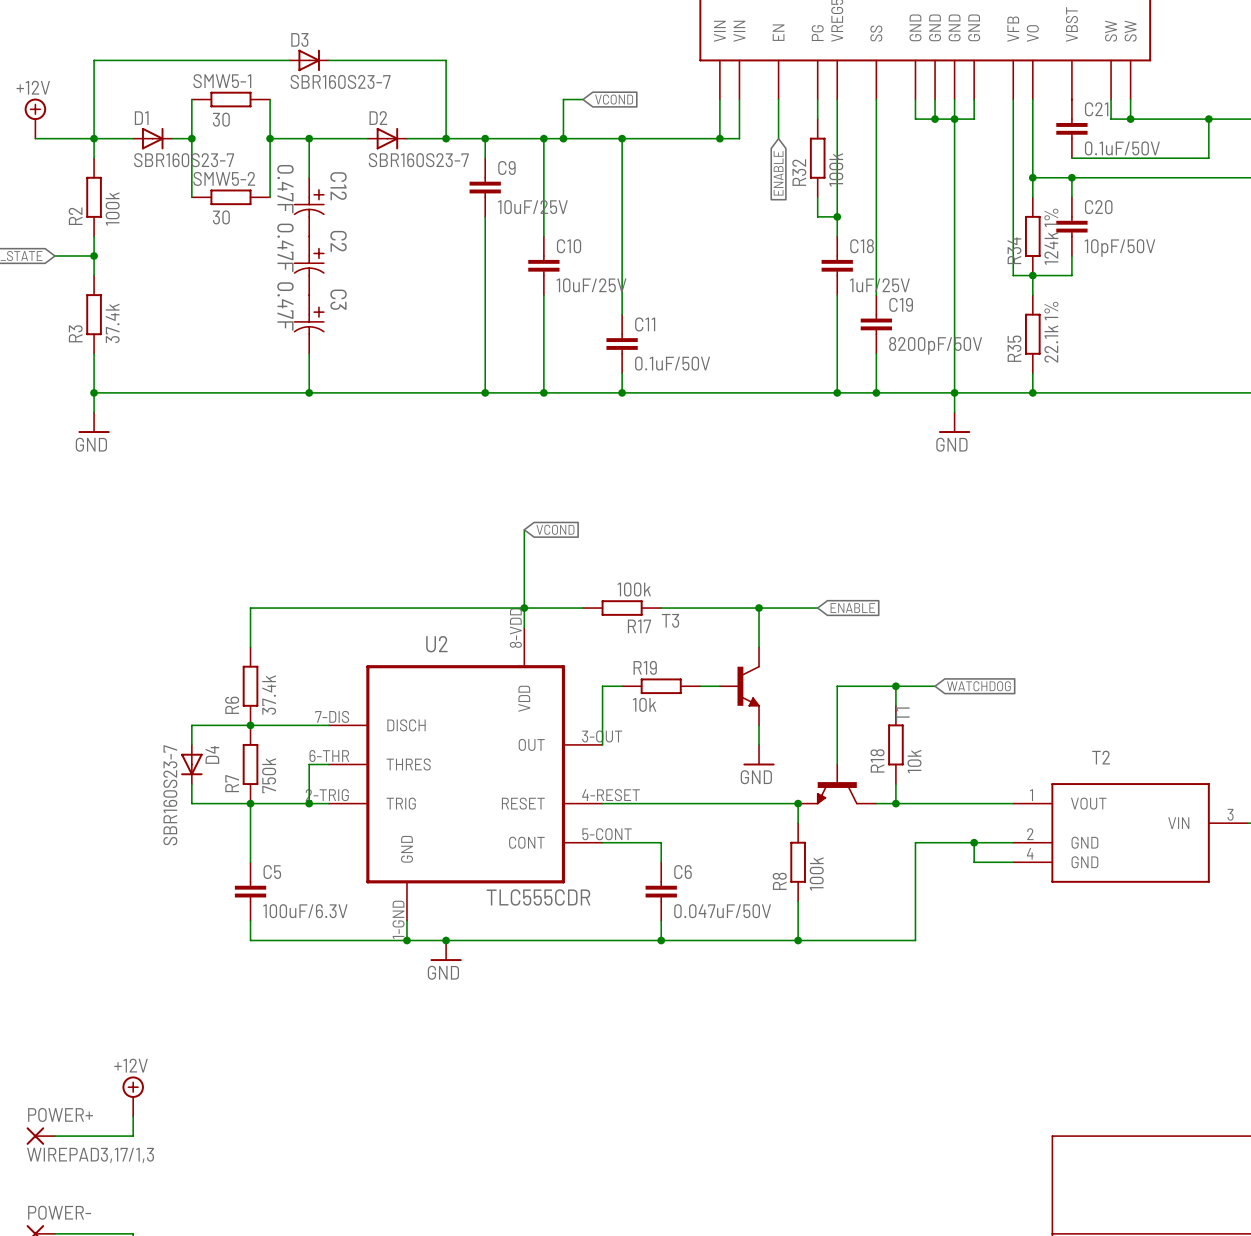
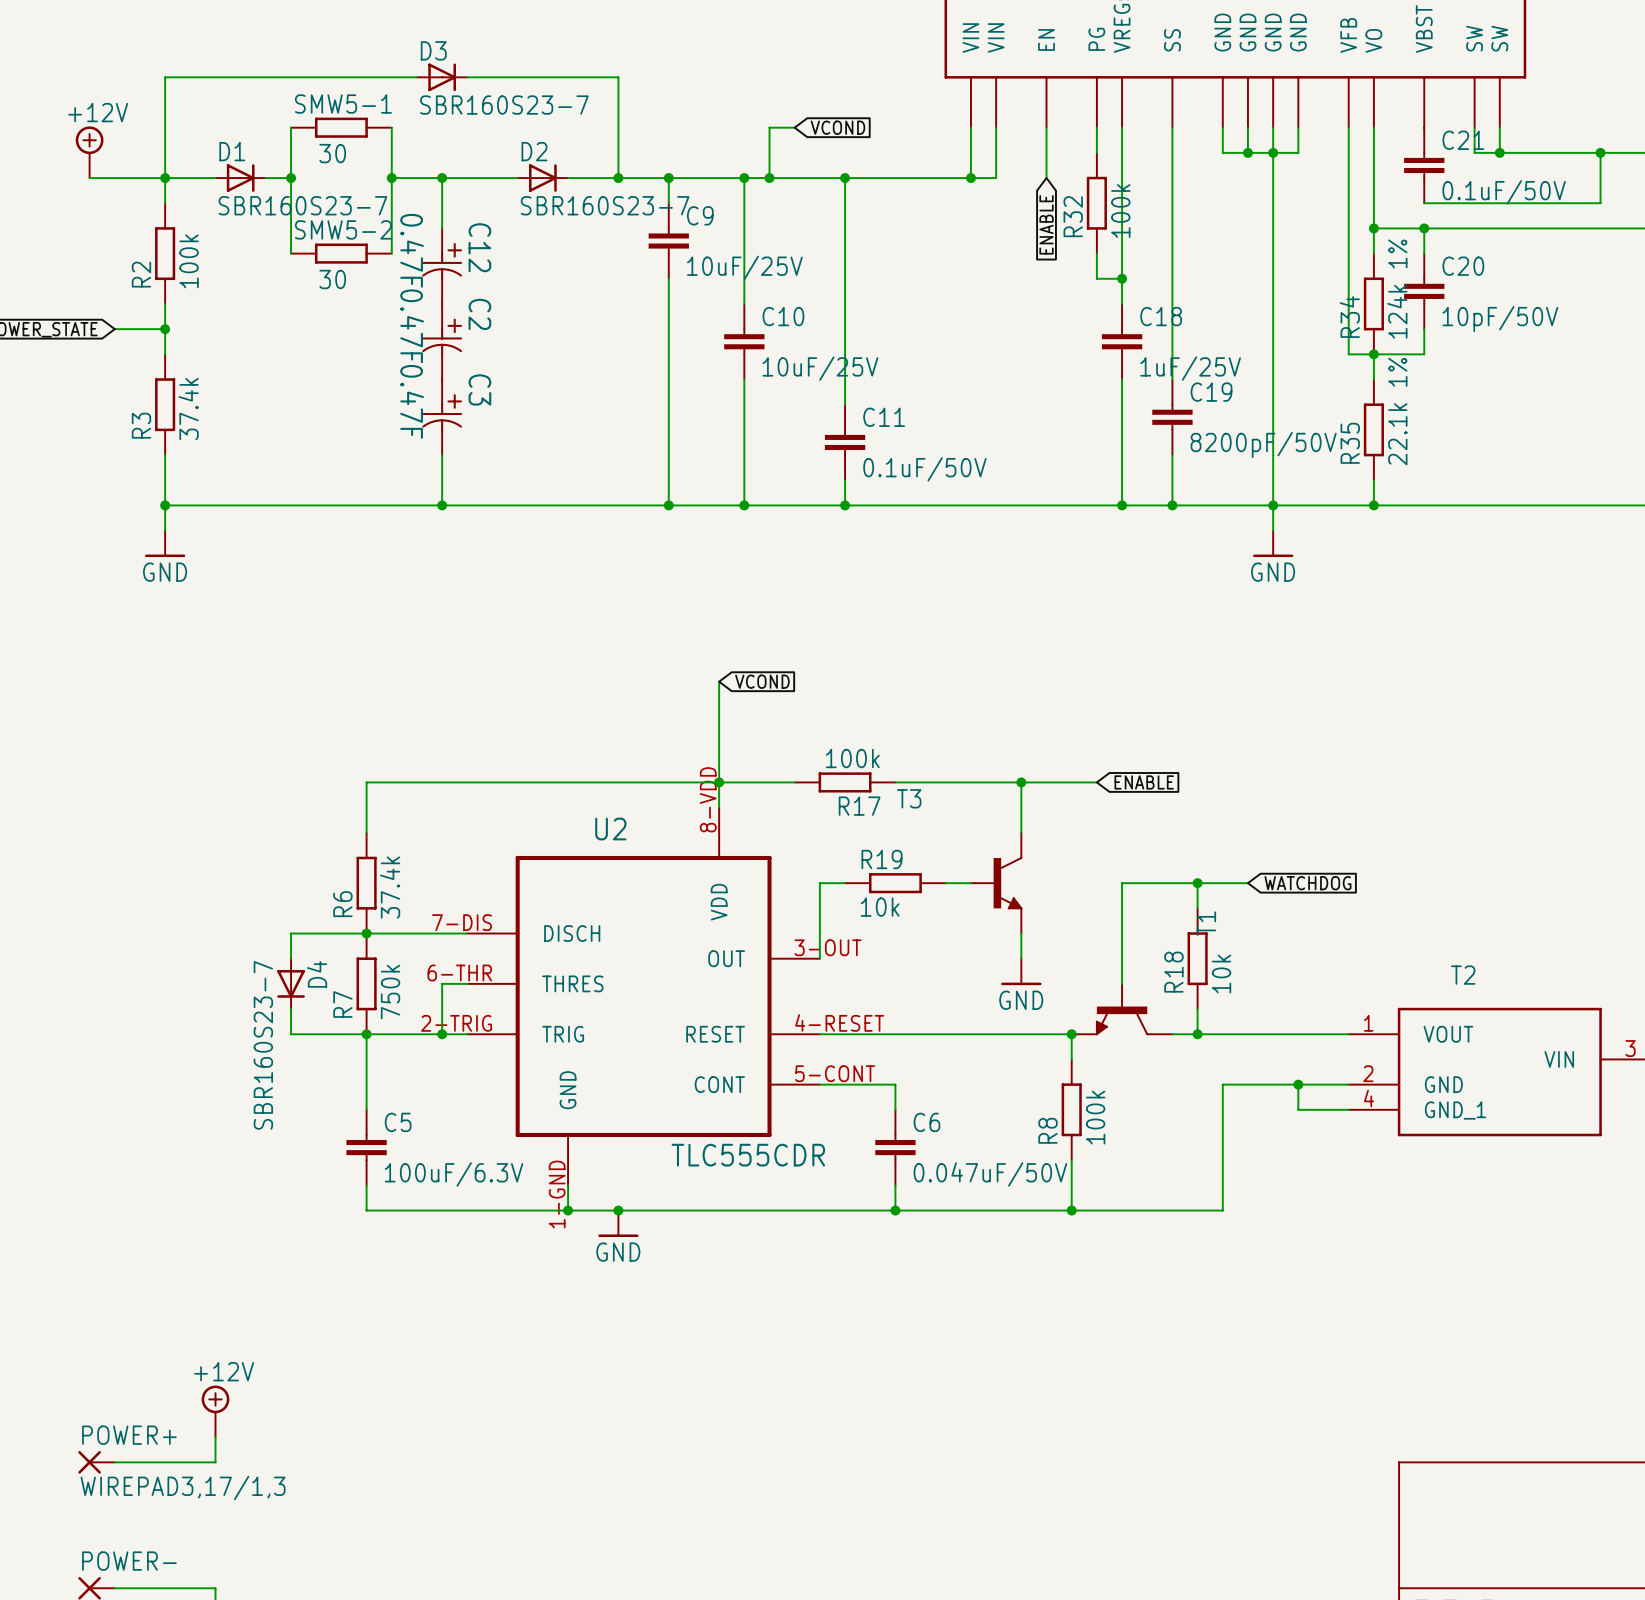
T2 pin name: GND (1084, 862) -> GND_1 (1455, 1110)

